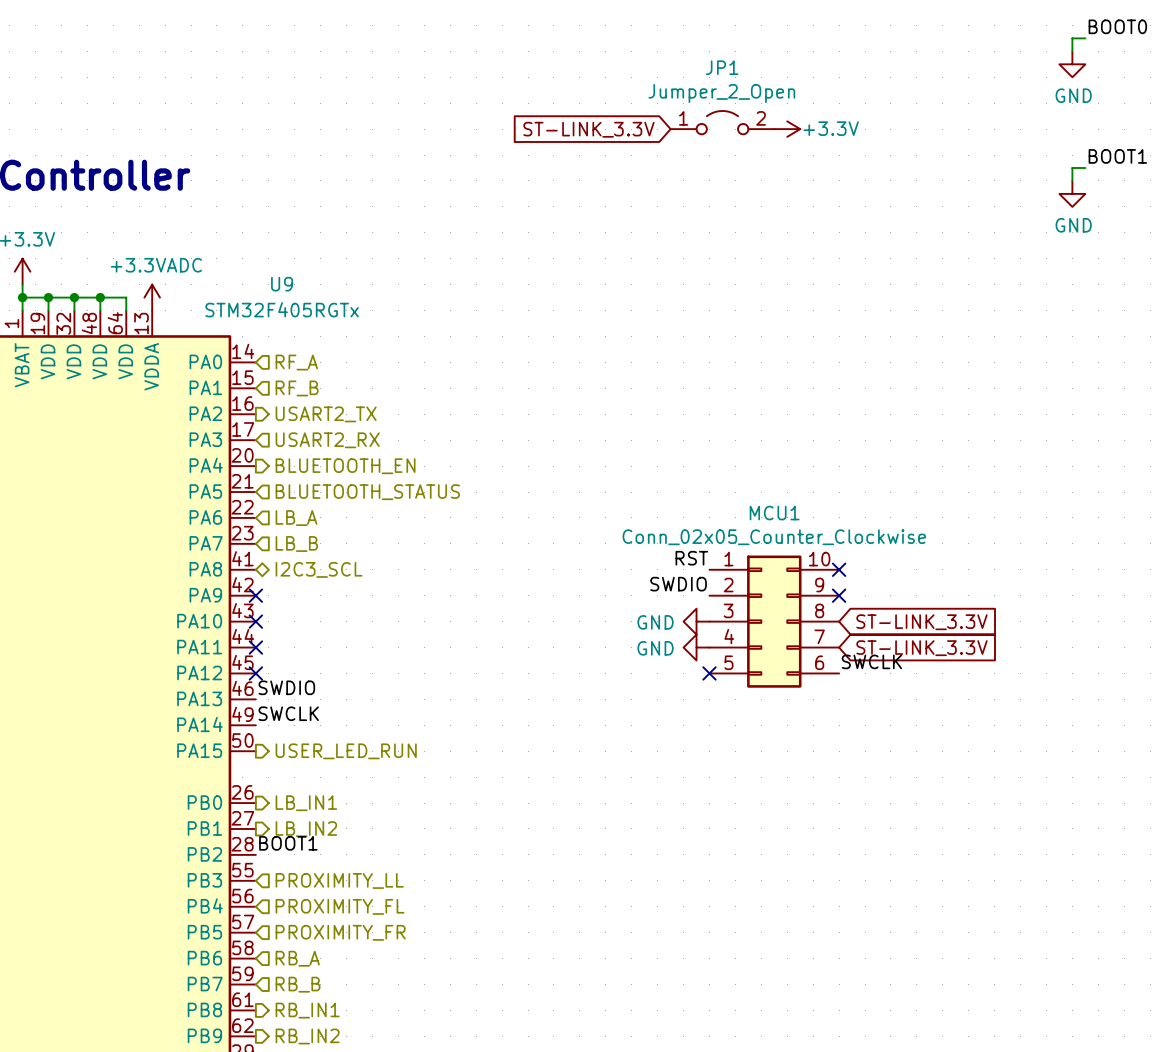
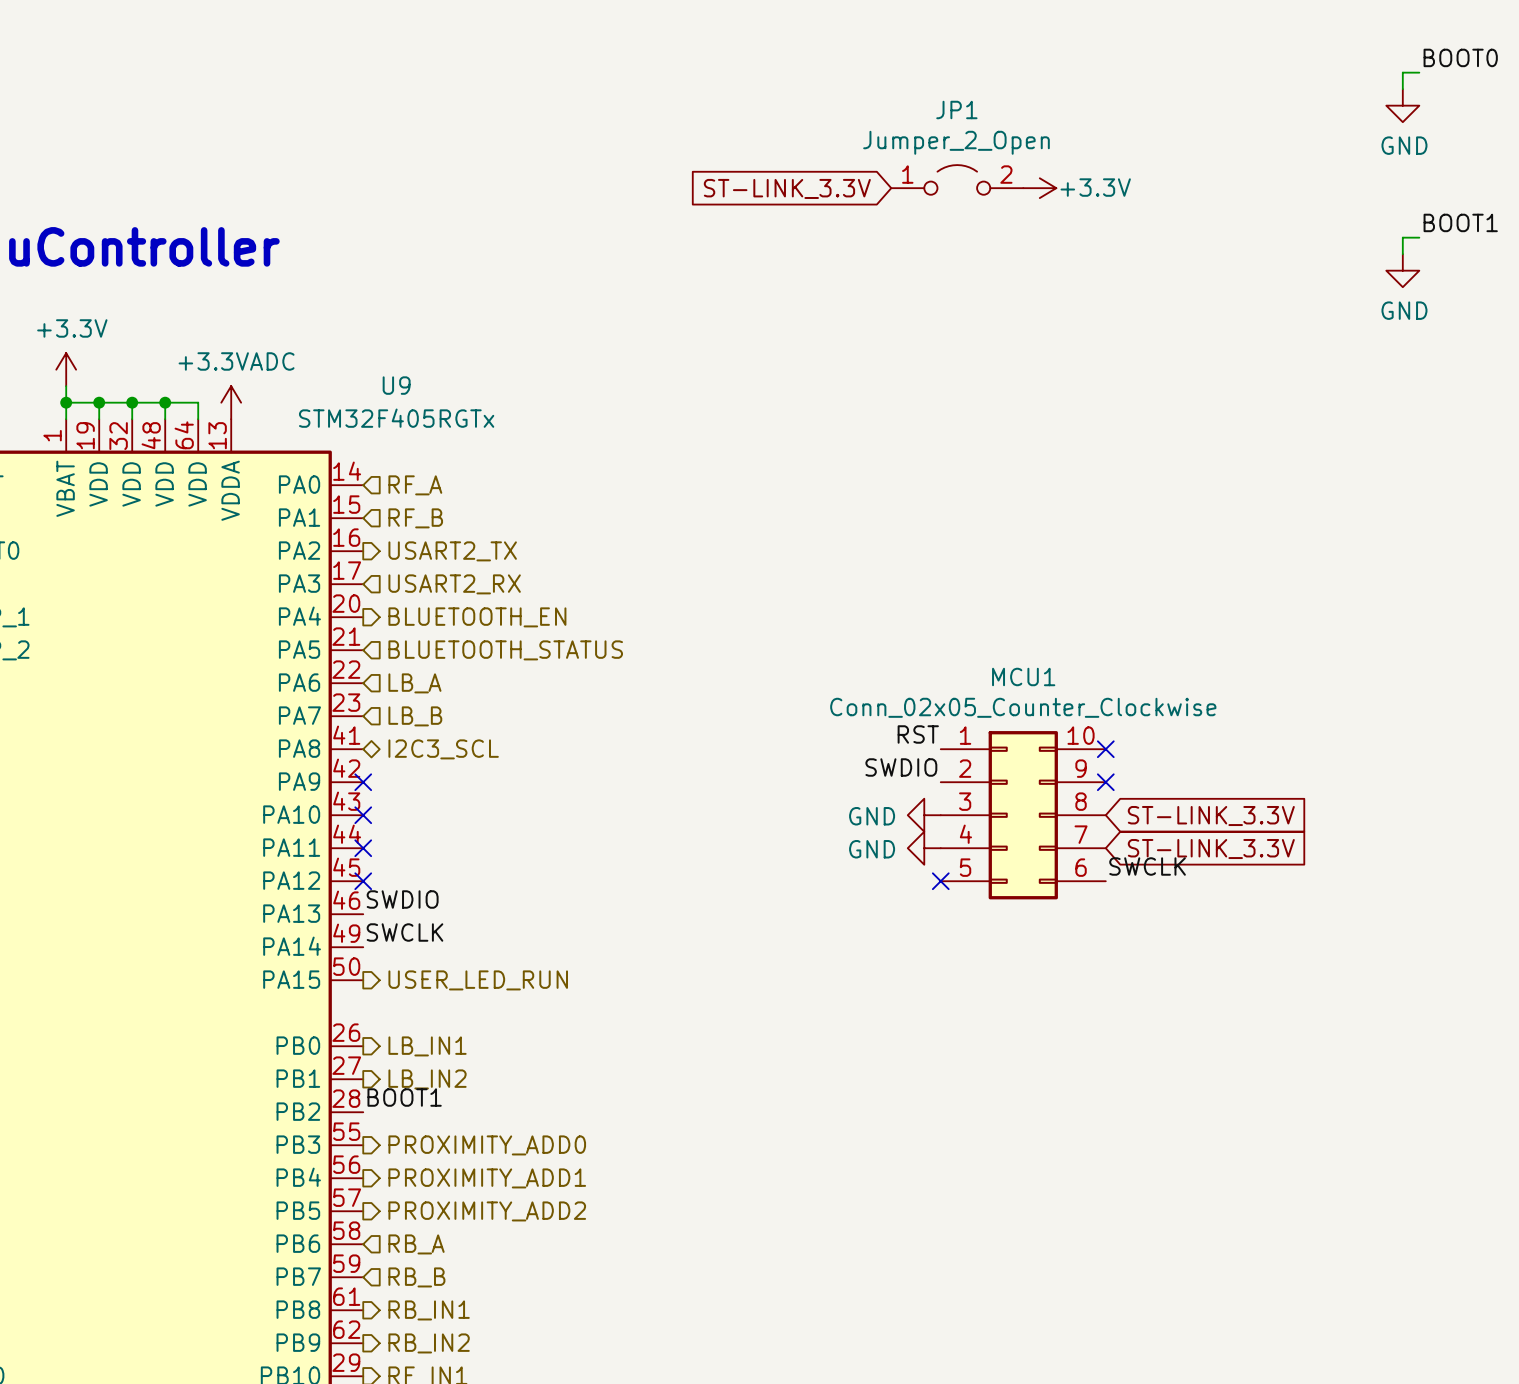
hierarchical label shape: input (339, 880) -> output (487, 1145)
hierarchical label: PROXIMITY_LL (339, 880) -> PROXIMITY_ADD0 (487, 1145)
hierarchical label shape: input (340, 906) -> output (487, 1178)
hierarchical label: PROXIMITY_FL (340, 906) -> PROXIMITY_ADD1 (487, 1178)
hierarchical label shape: input (340, 932) -> output (487, 1211)
hierarchical label: PROXIMITY_FR (340, 932) -> PROXIMITY_ADD2 (487, 1211)

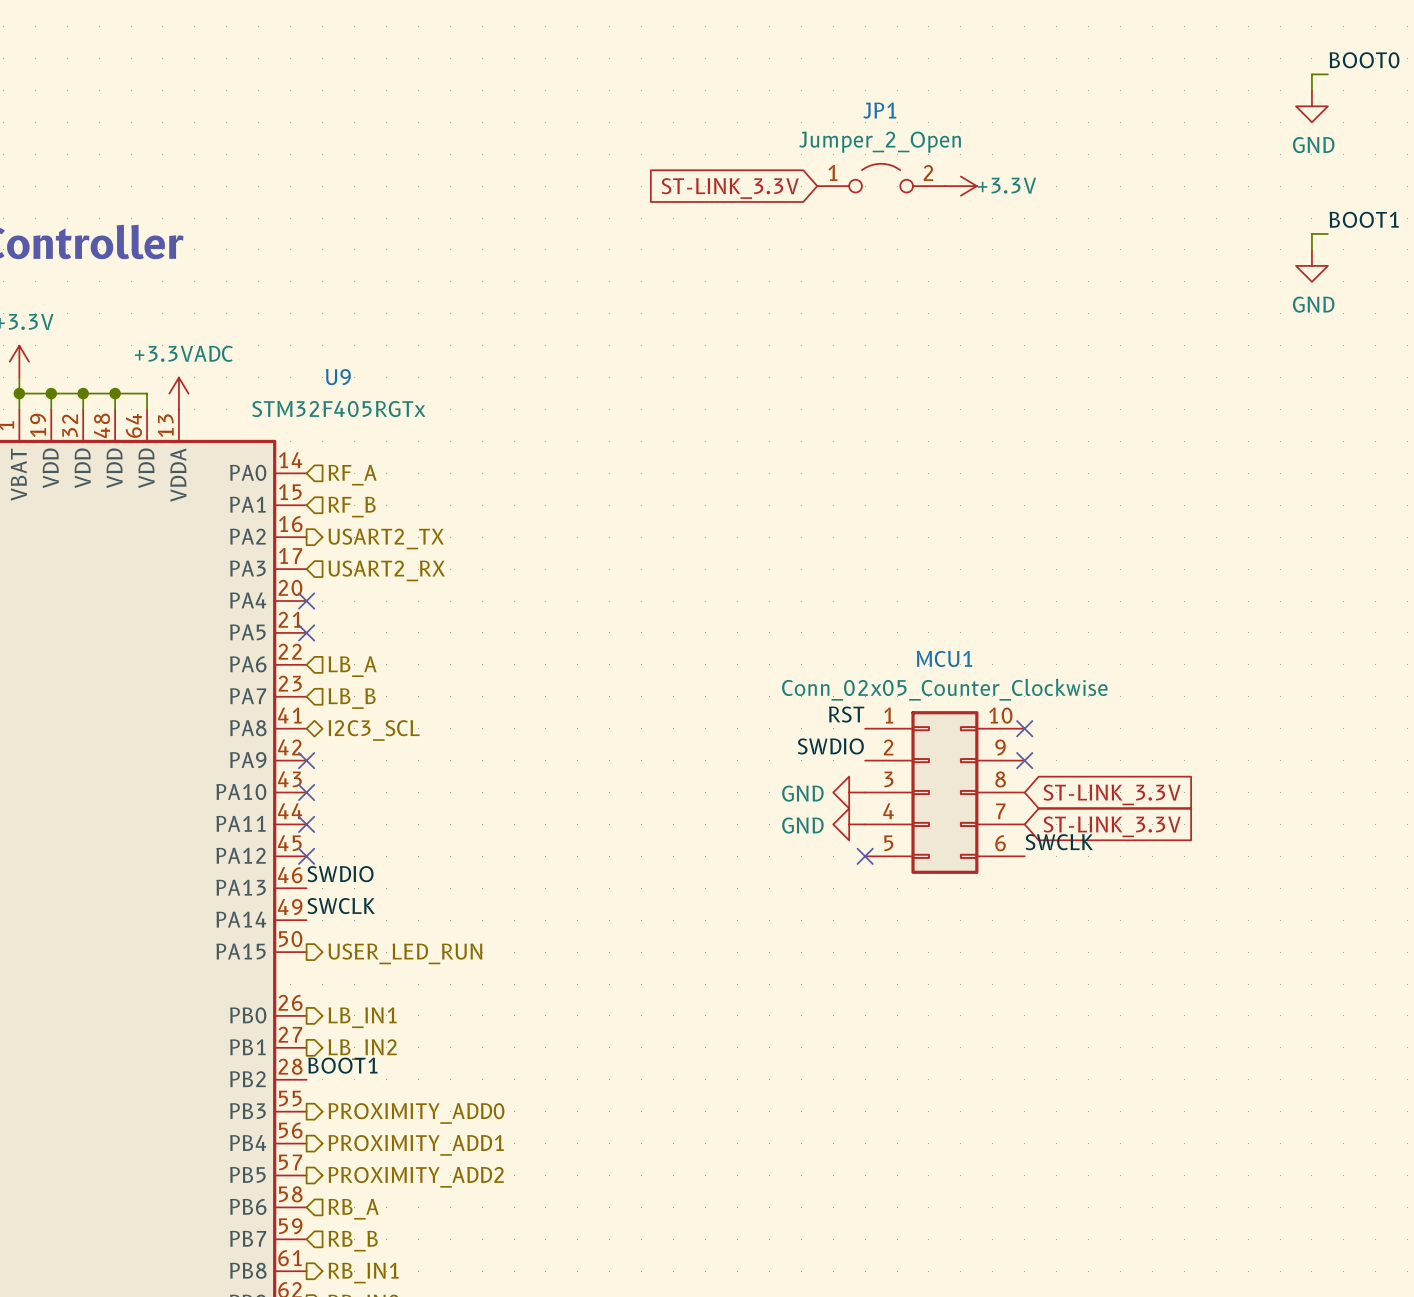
no-connect mark: none -> (306, 601)
hierarchical label: BLUETOOTH_EN (477, 617) -> none
no-connect mark: none -> (306, 632)
hierarchical label: BLUETOOTH_STATUS (505, 650) -> none

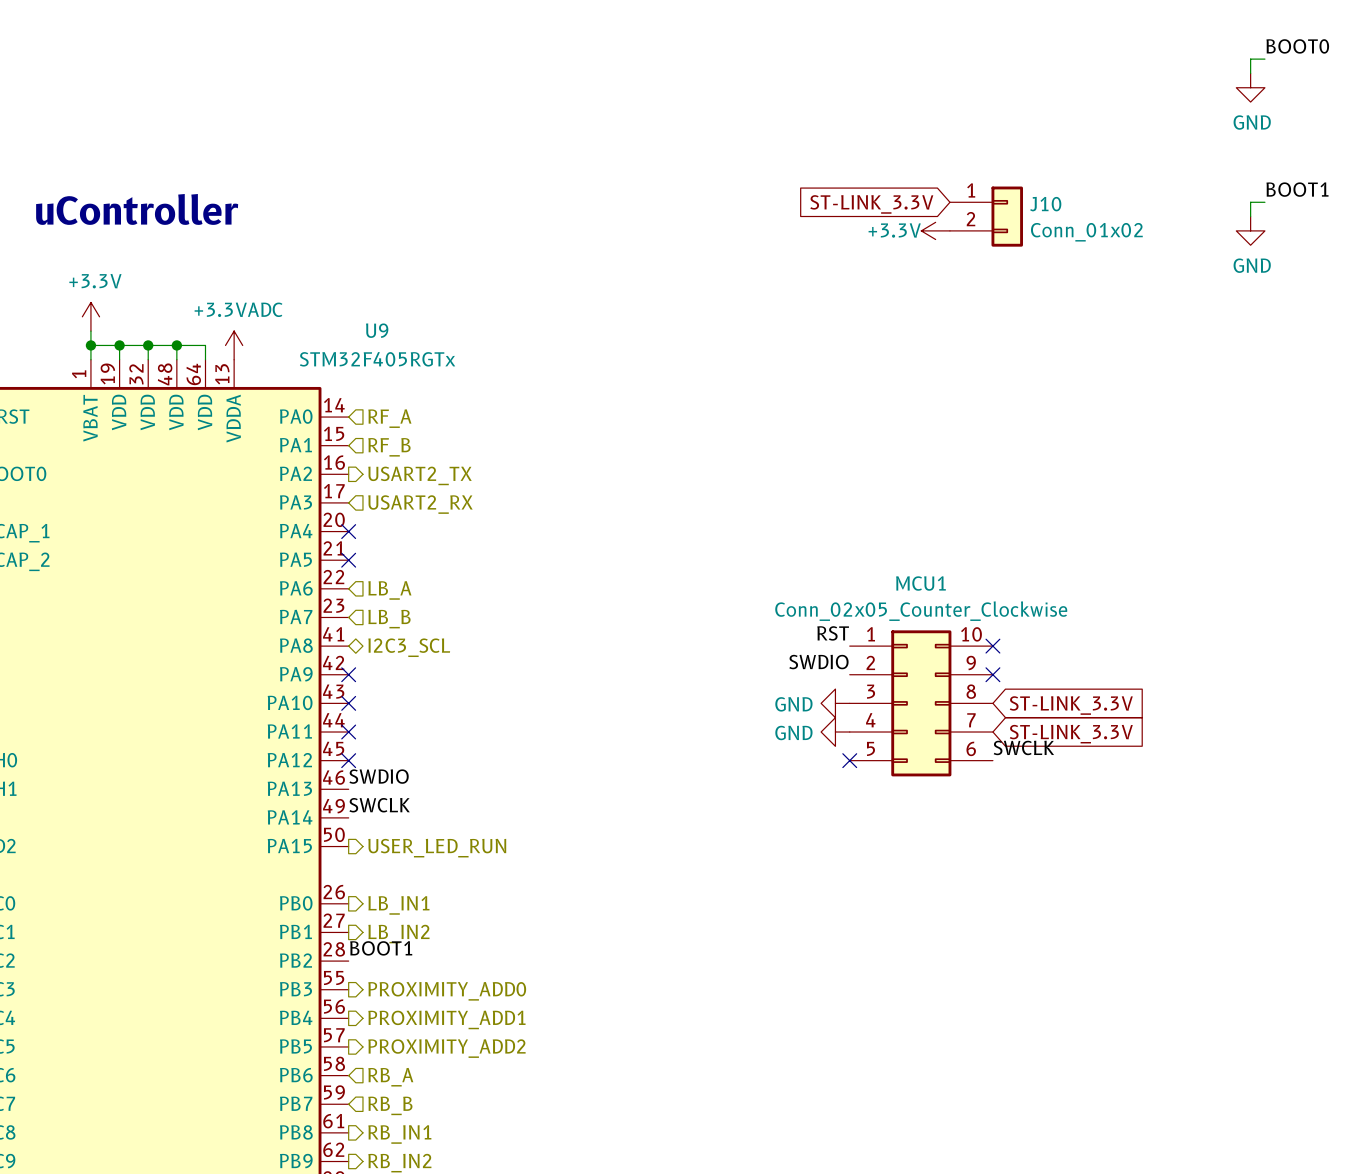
JP1: Jumper_2_Open (881, 178) -> none
power symbol rotation: 0° (960, 186) -> 180° (935, 230)
power symbol position: +3.3V (960, 186) -> +3.3V (935, 230)
global label position: ST-LINK_3.3V (730, 188) -> ST-LINK_3.3V (871, 204)
J10: none -> Conn_01x02 (986, 216)

